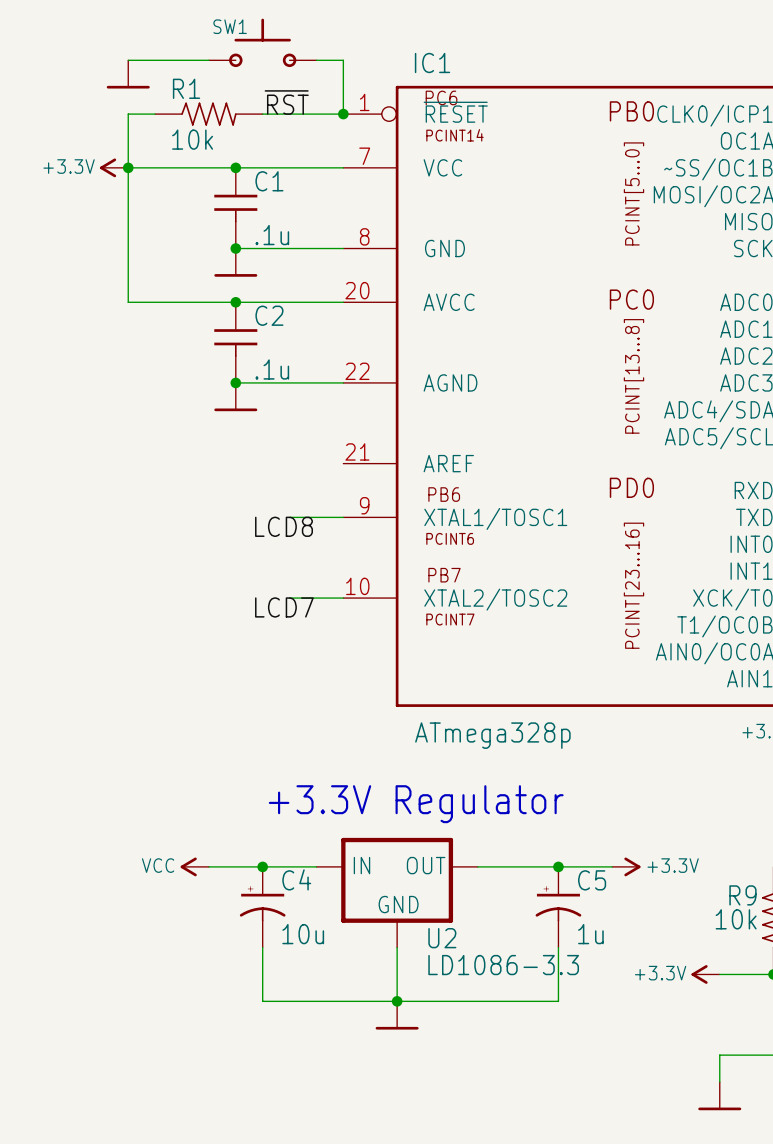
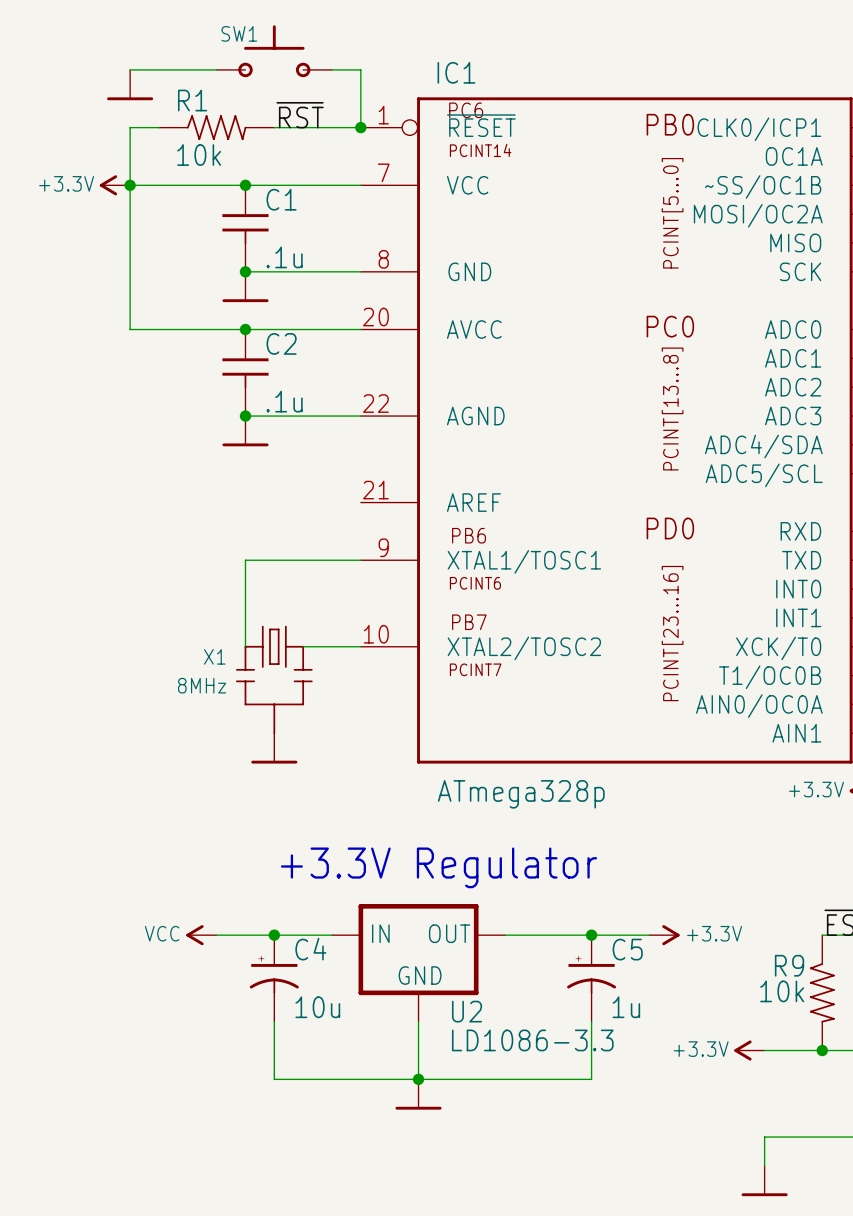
wire: none -> (303, 560) (245, 560) (245, 646)
label: LCD8 (284, 526) -> none
label: LCD7 (284, 607) -> none
X1: none -> 8MHz (274, 679)
power symbol: none -> (274, 748)

